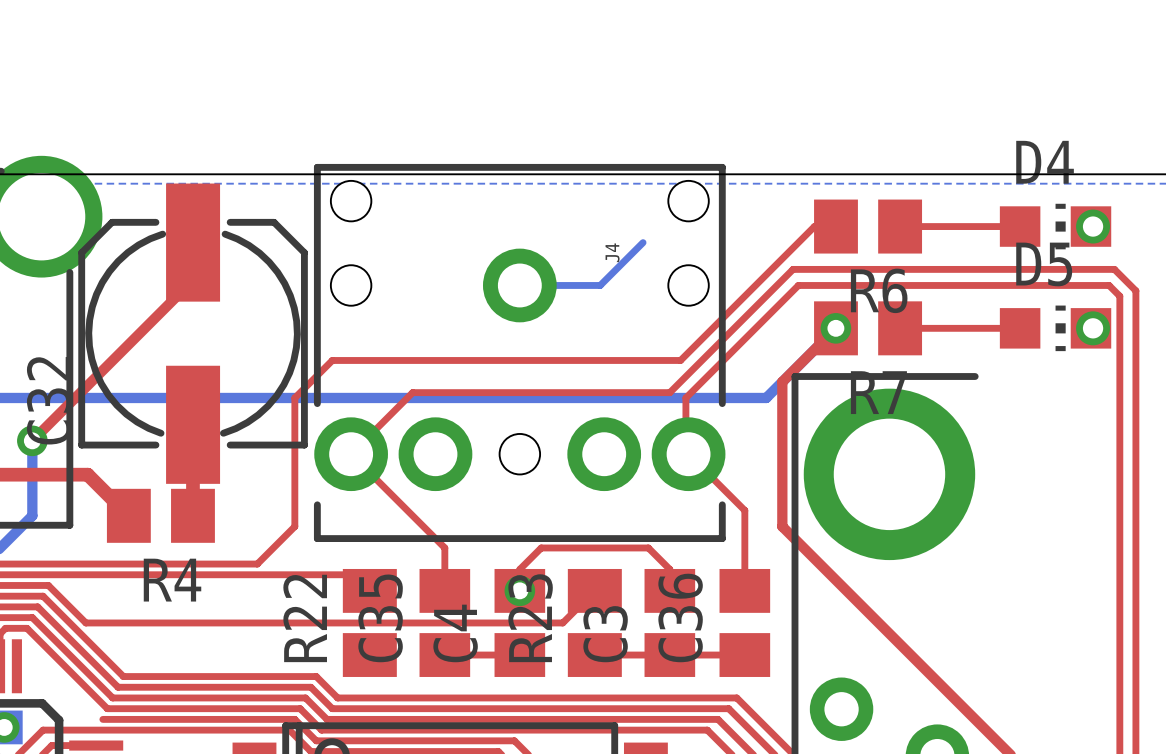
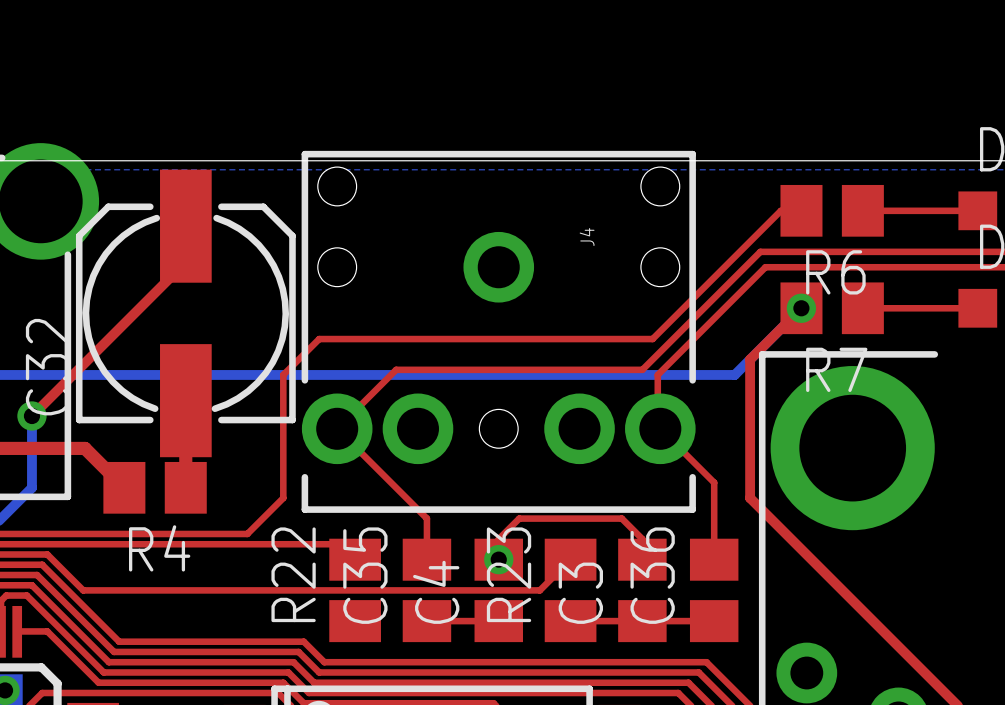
bottom track: (643, 242) (600, 285) (519, 285) -> none
top track: none -> (17, 631) (47, 631) (99, 682)

